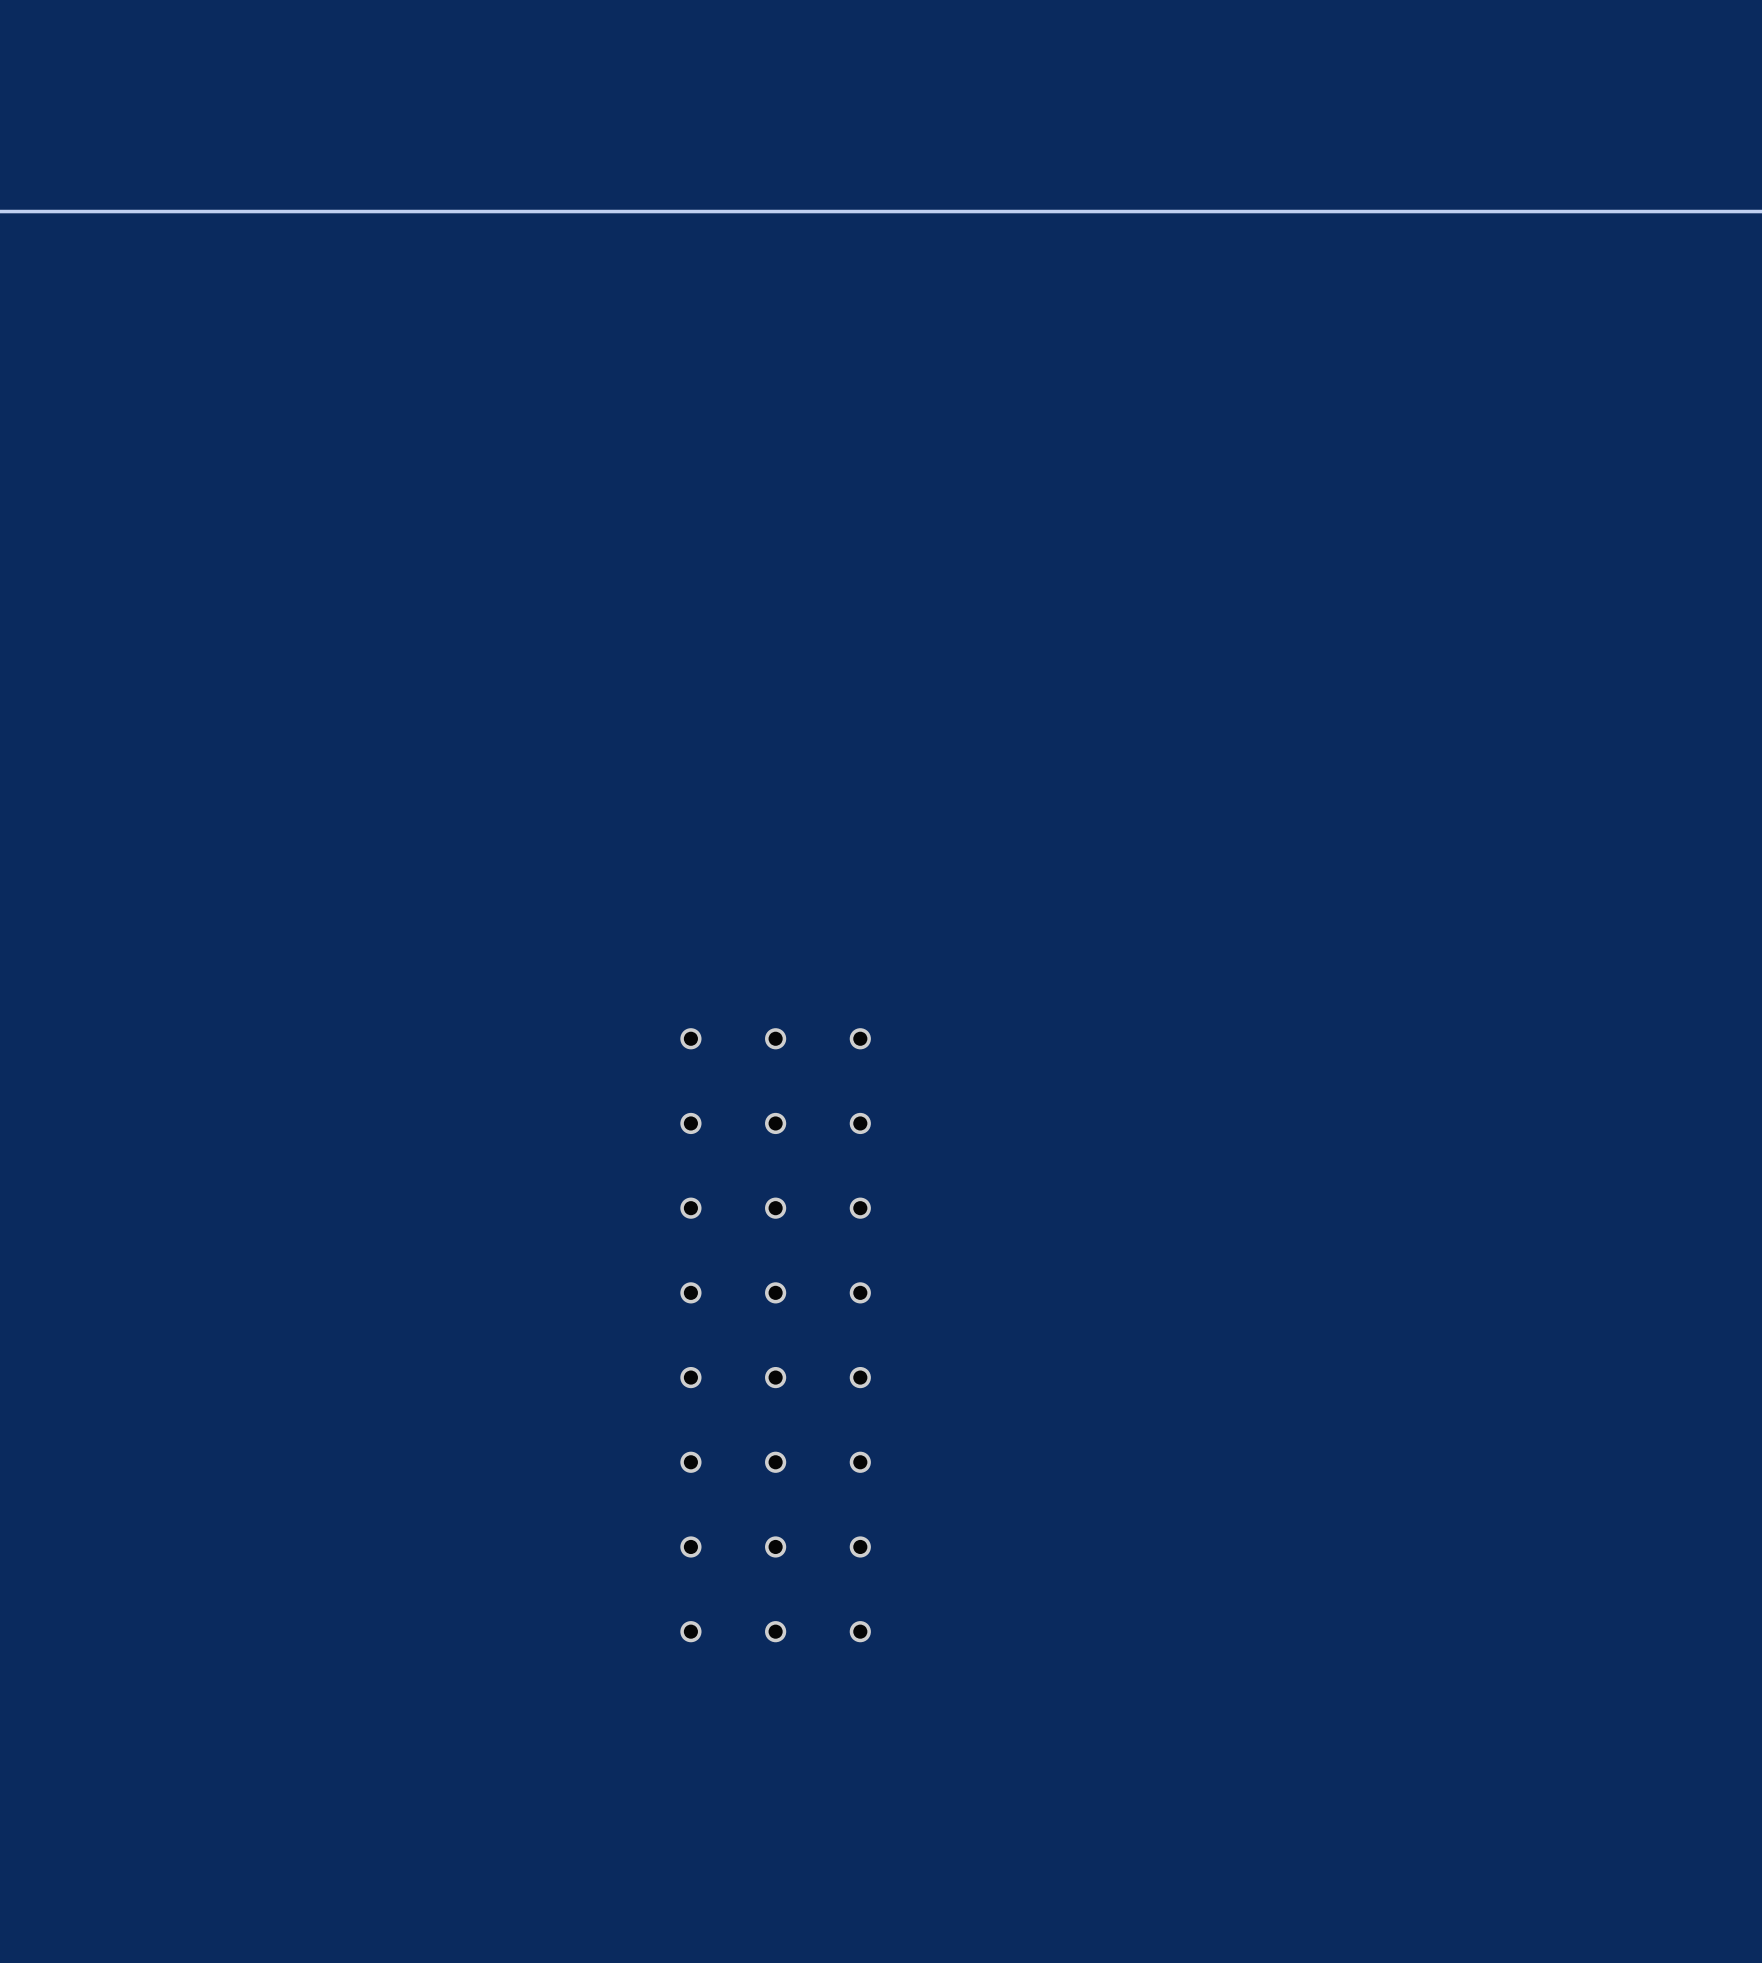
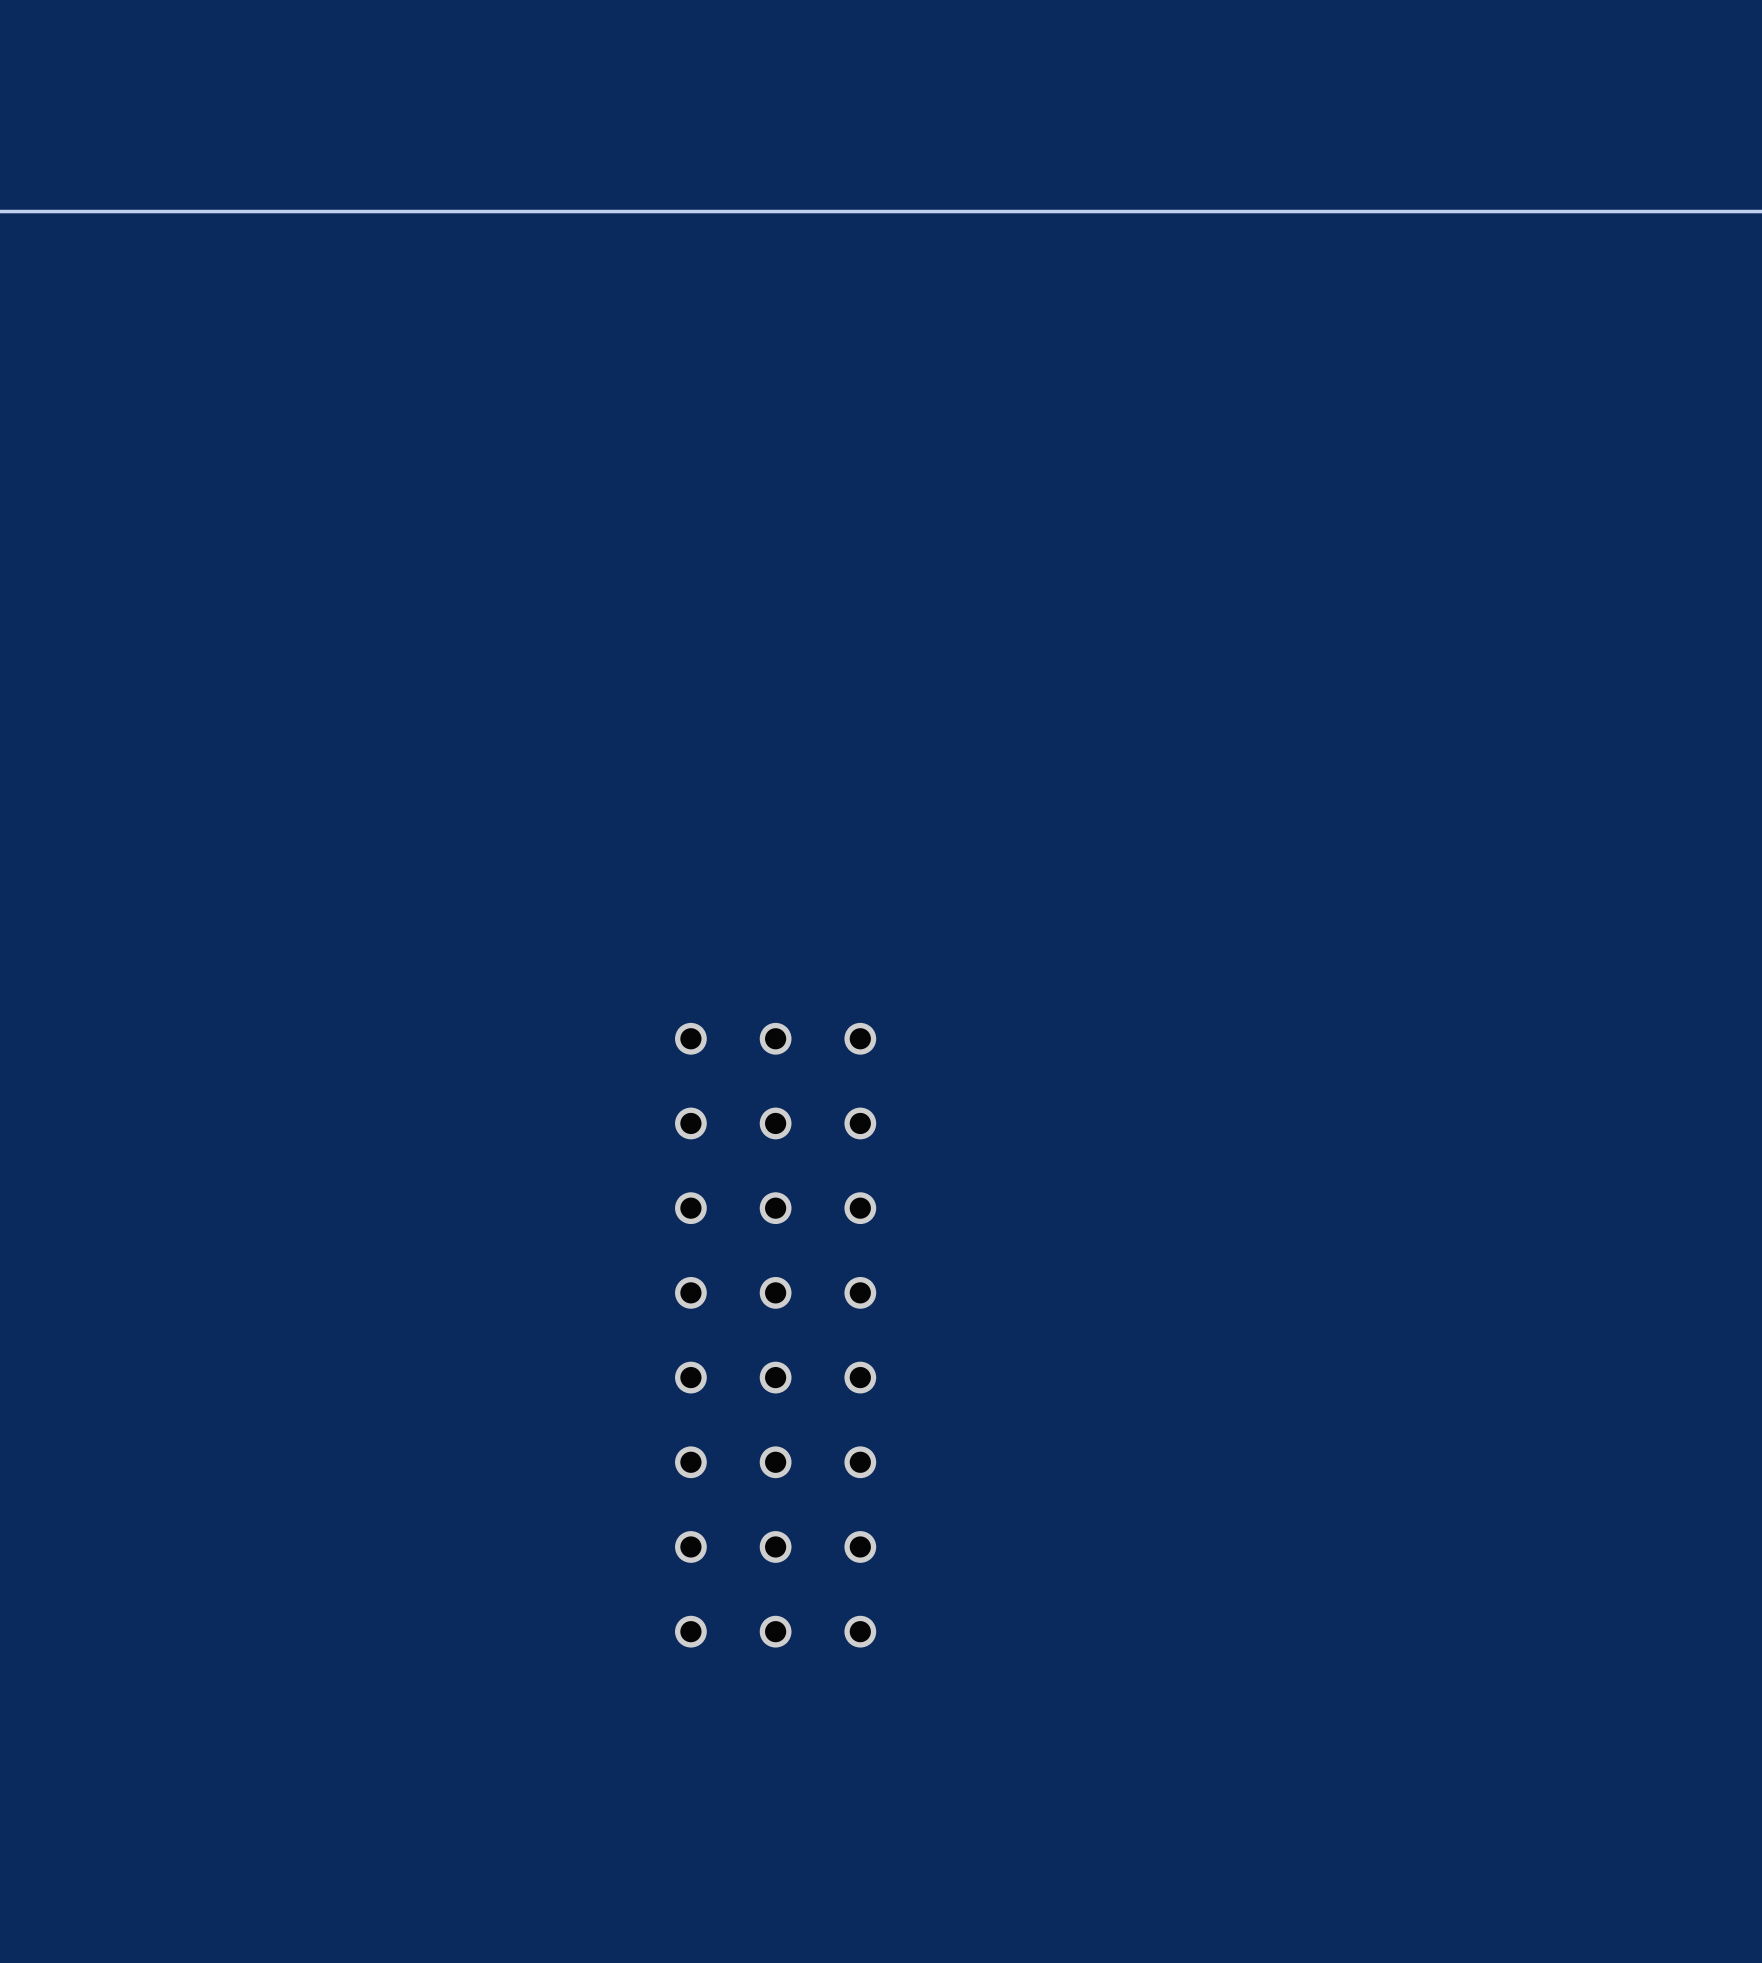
part footprint: [680, 1028, 871, 1643] -> [675, 1022, 877, 1648]

